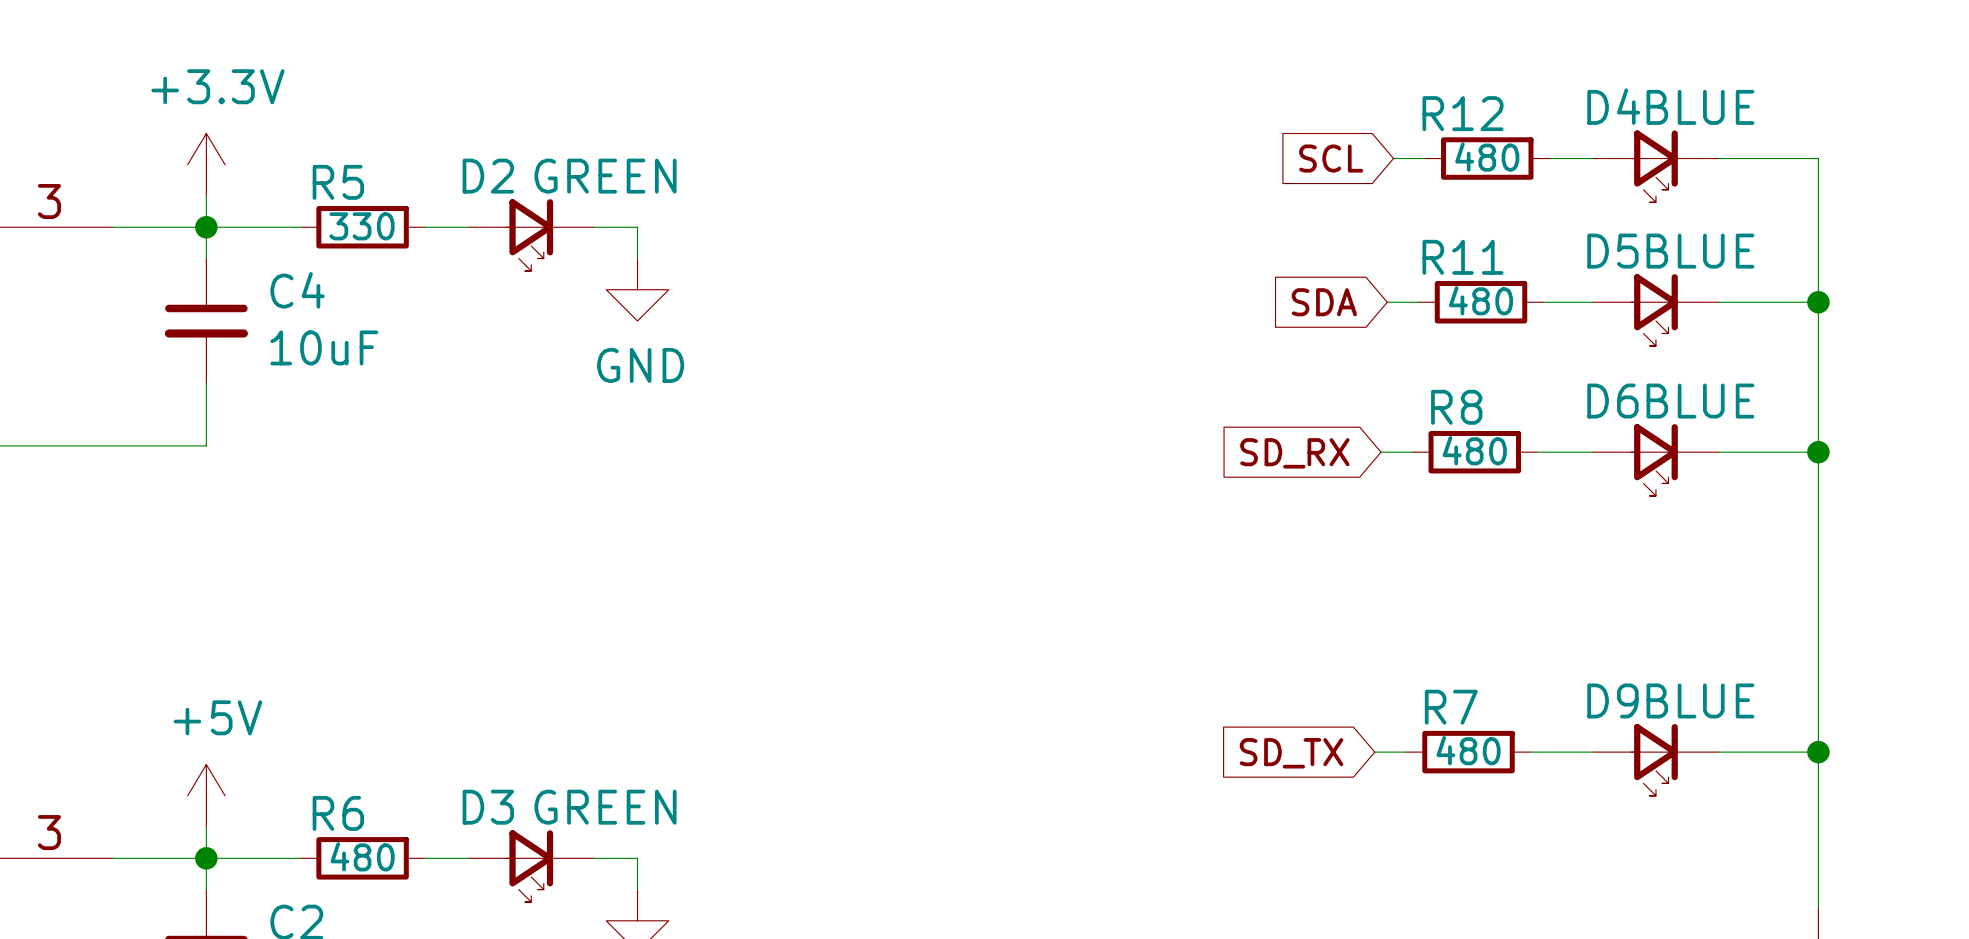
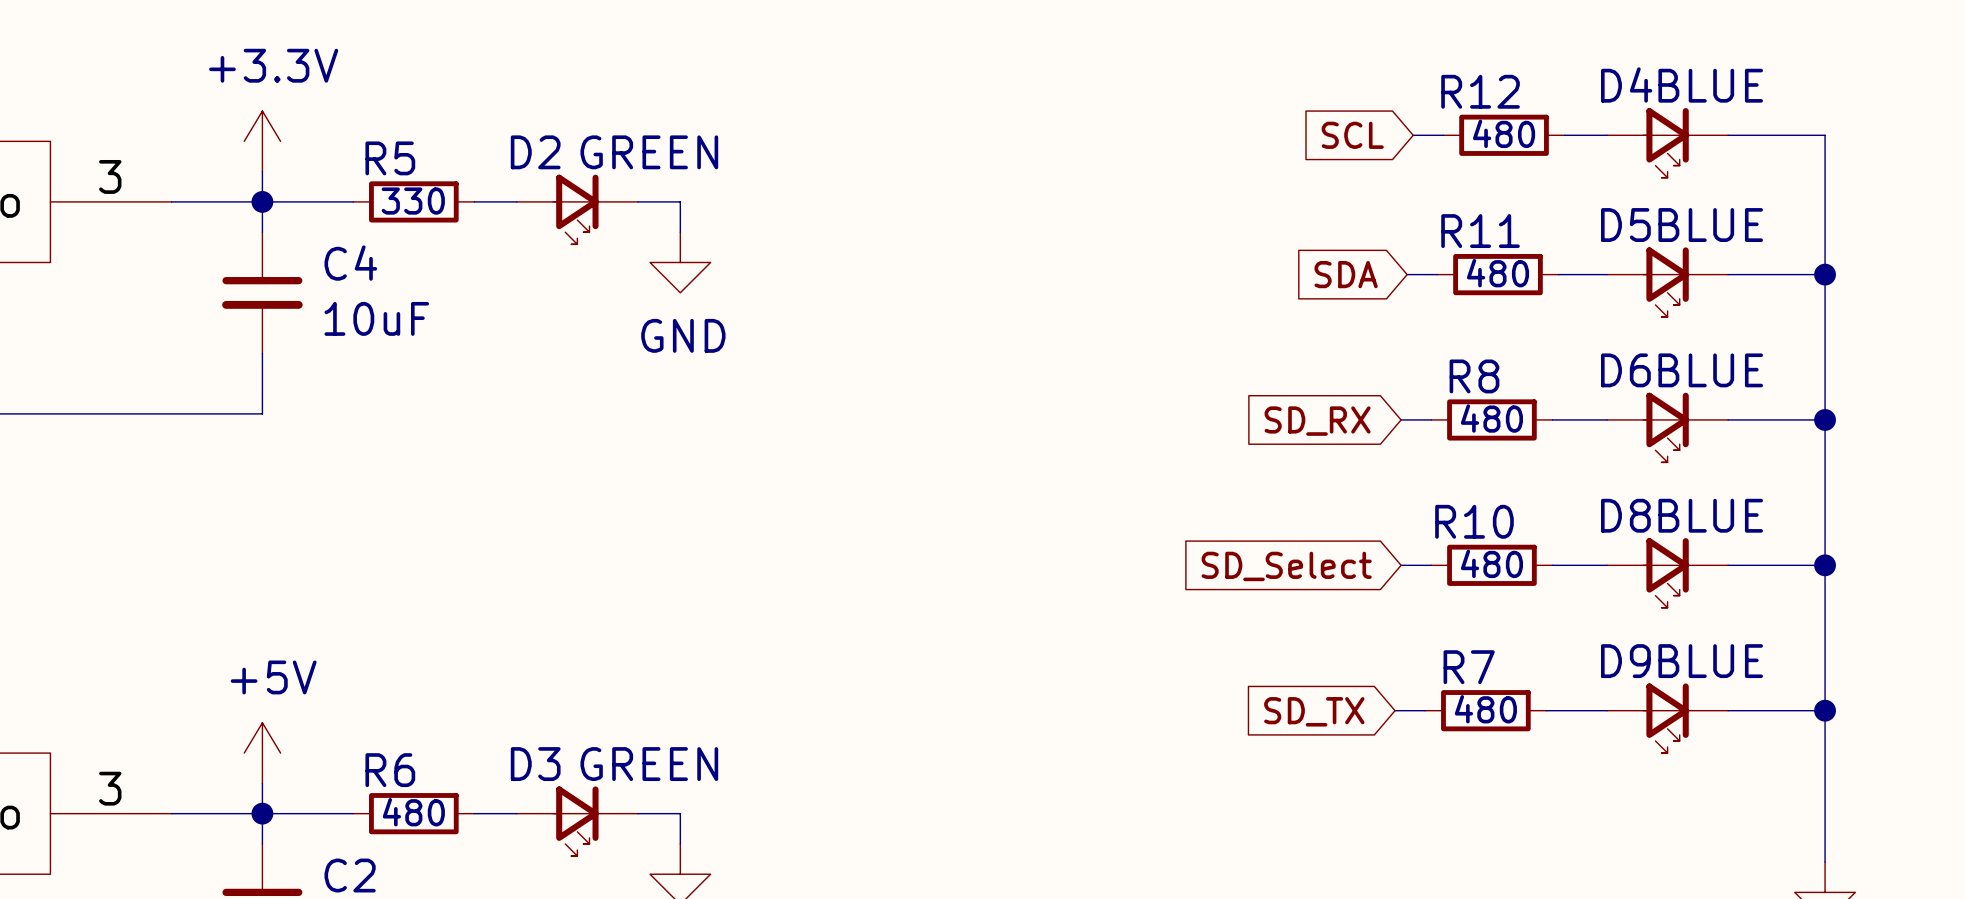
wire: none -> (1401, 565) (1431, 565)
R10: none -> 480 (1491, 565)
wire: none -> (1552, 565) (1607, 565)
wire: none -> (1728, 565) (1825, 565)
junction: none -> (1825, 565)
global label: none -> SD_Select (1286, 566)
D8: none -> BLUE (1667, 572)

